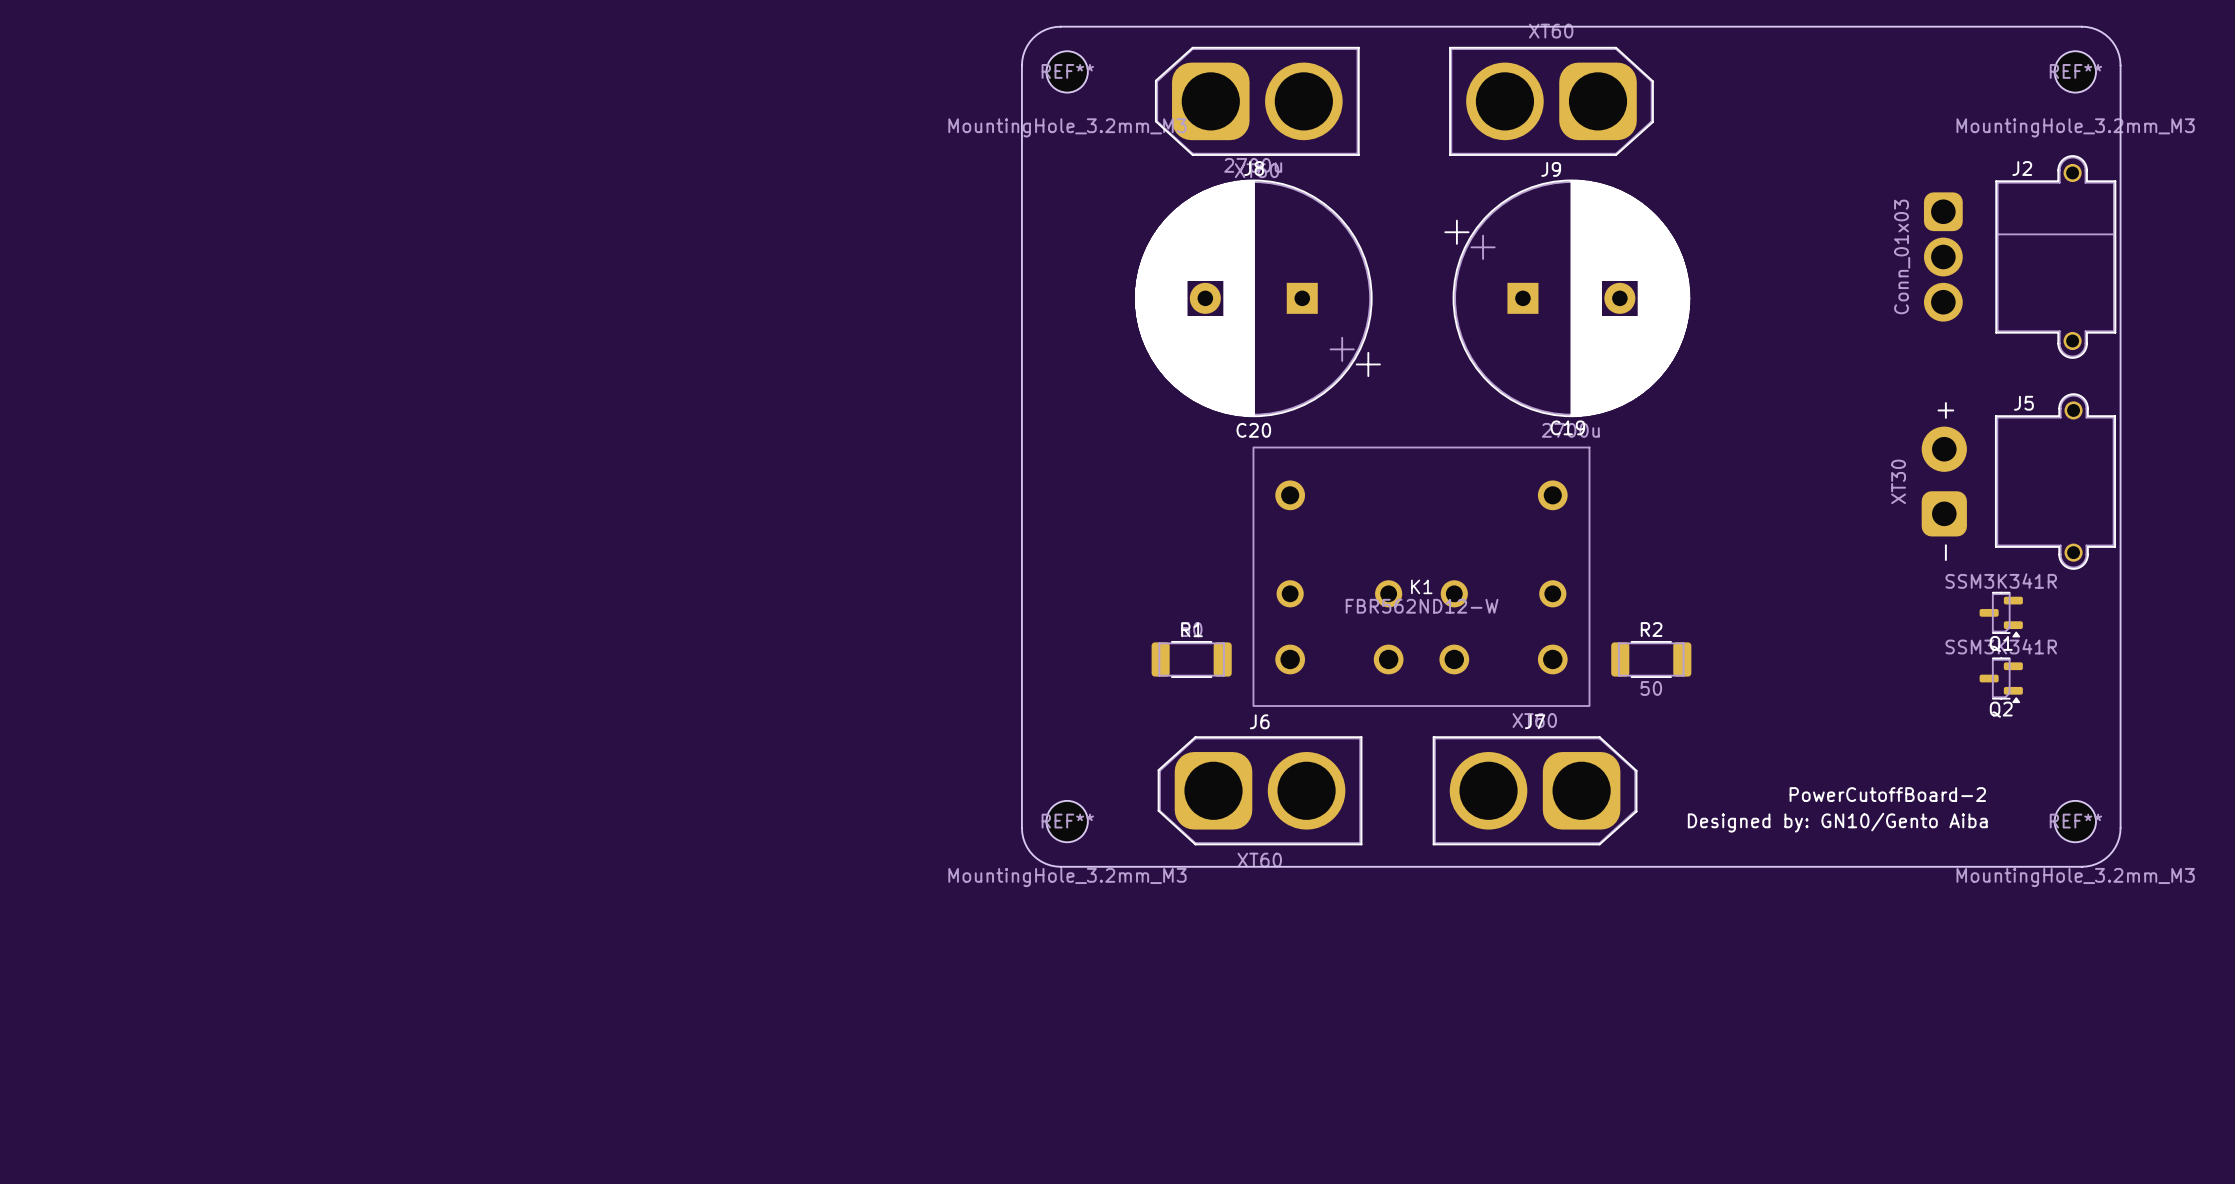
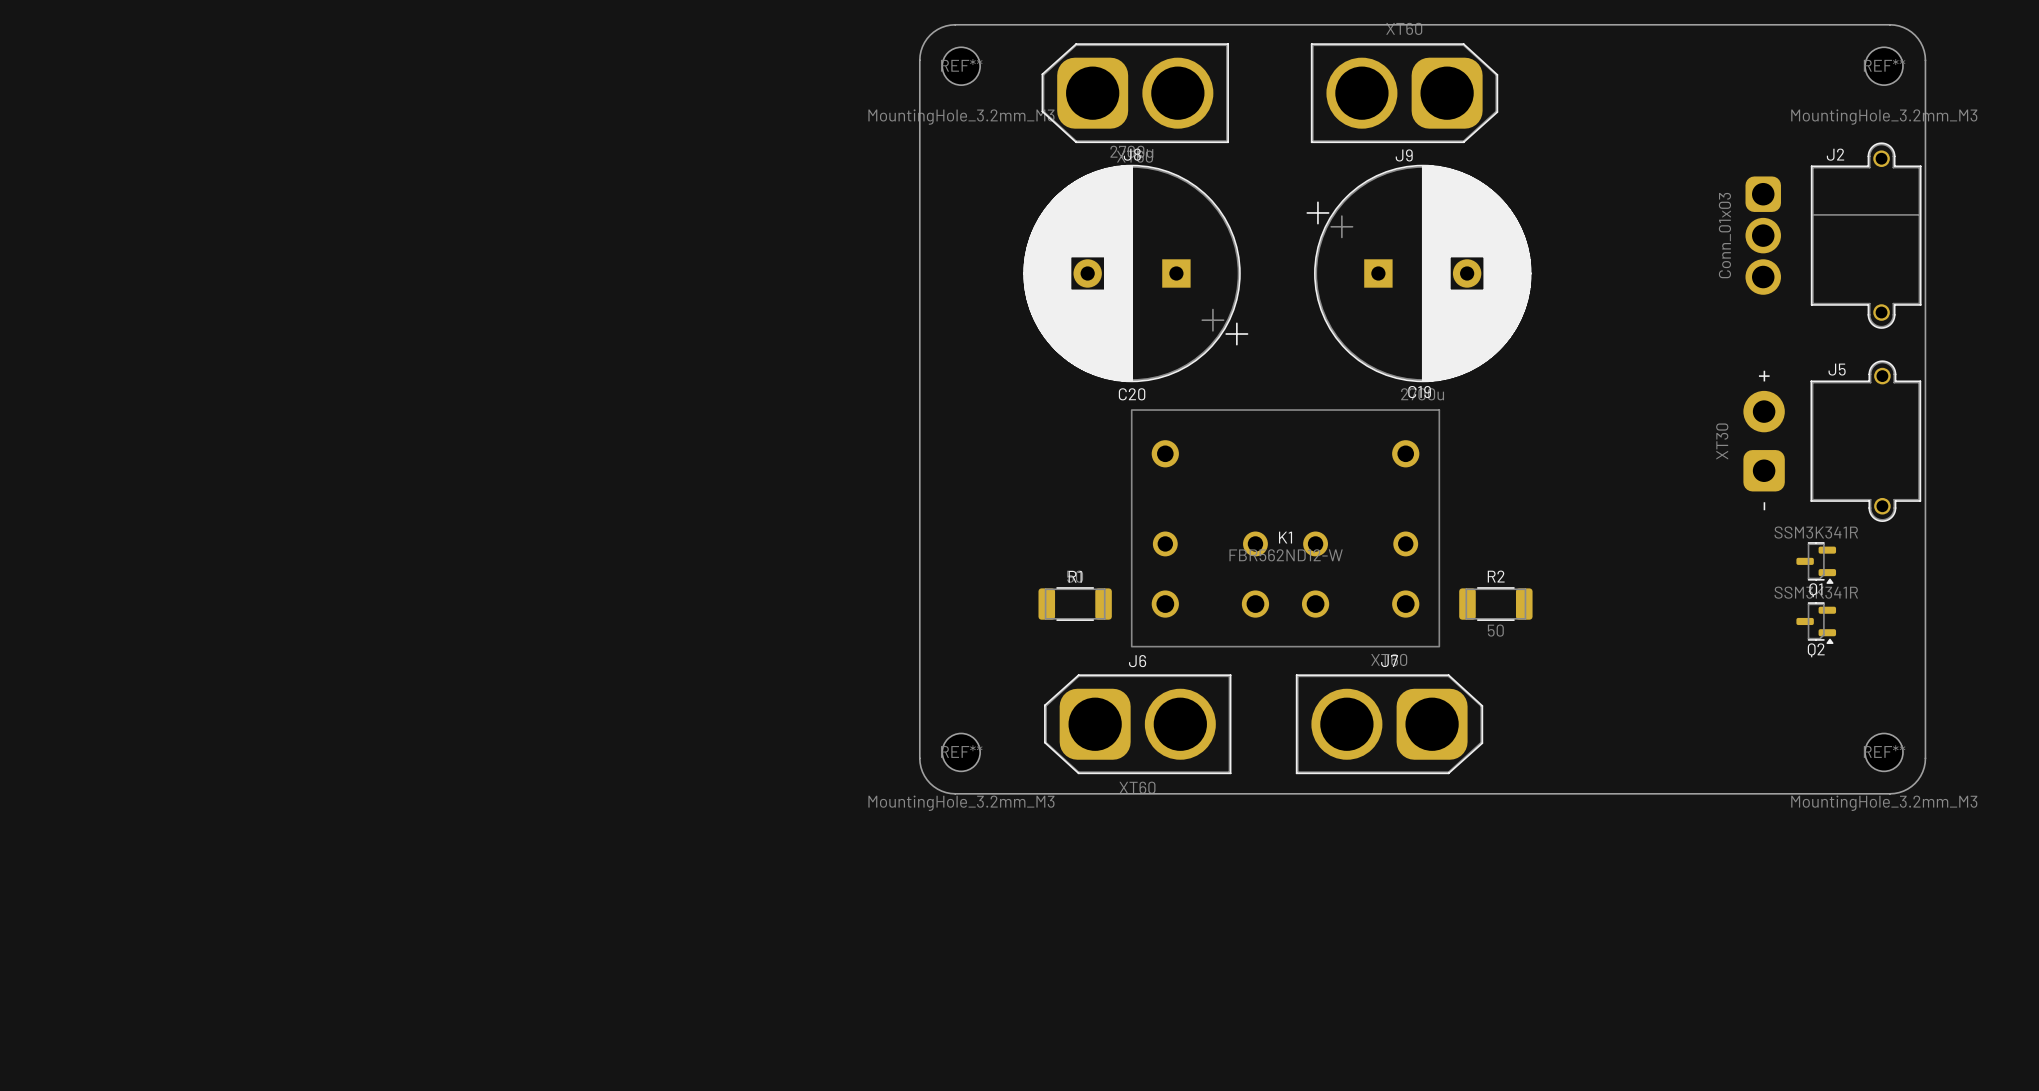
text: PowerCutoffBoard-2 (1887, 794) -> none
text: Designed by: GN10/Gento Aiba (1837, 822) -> none

